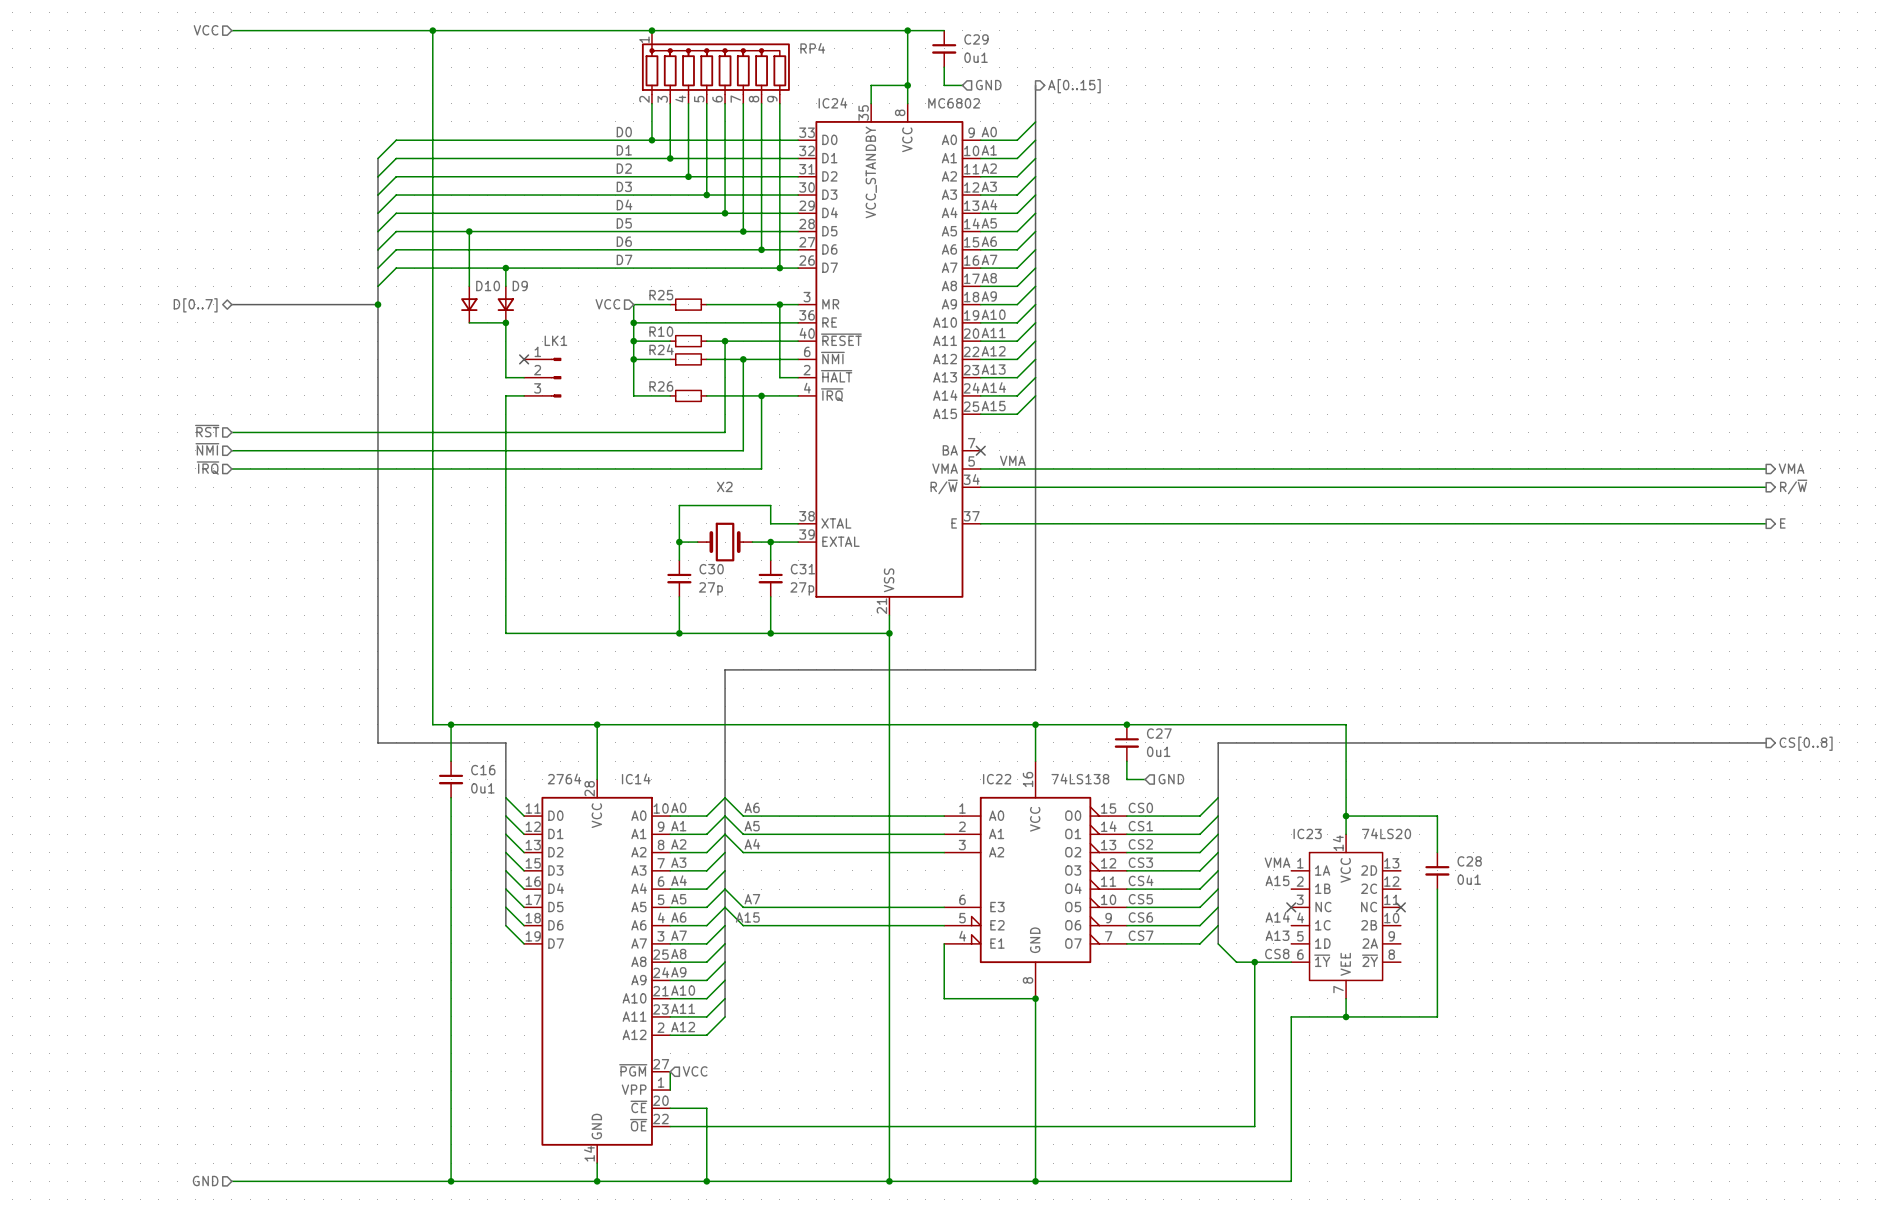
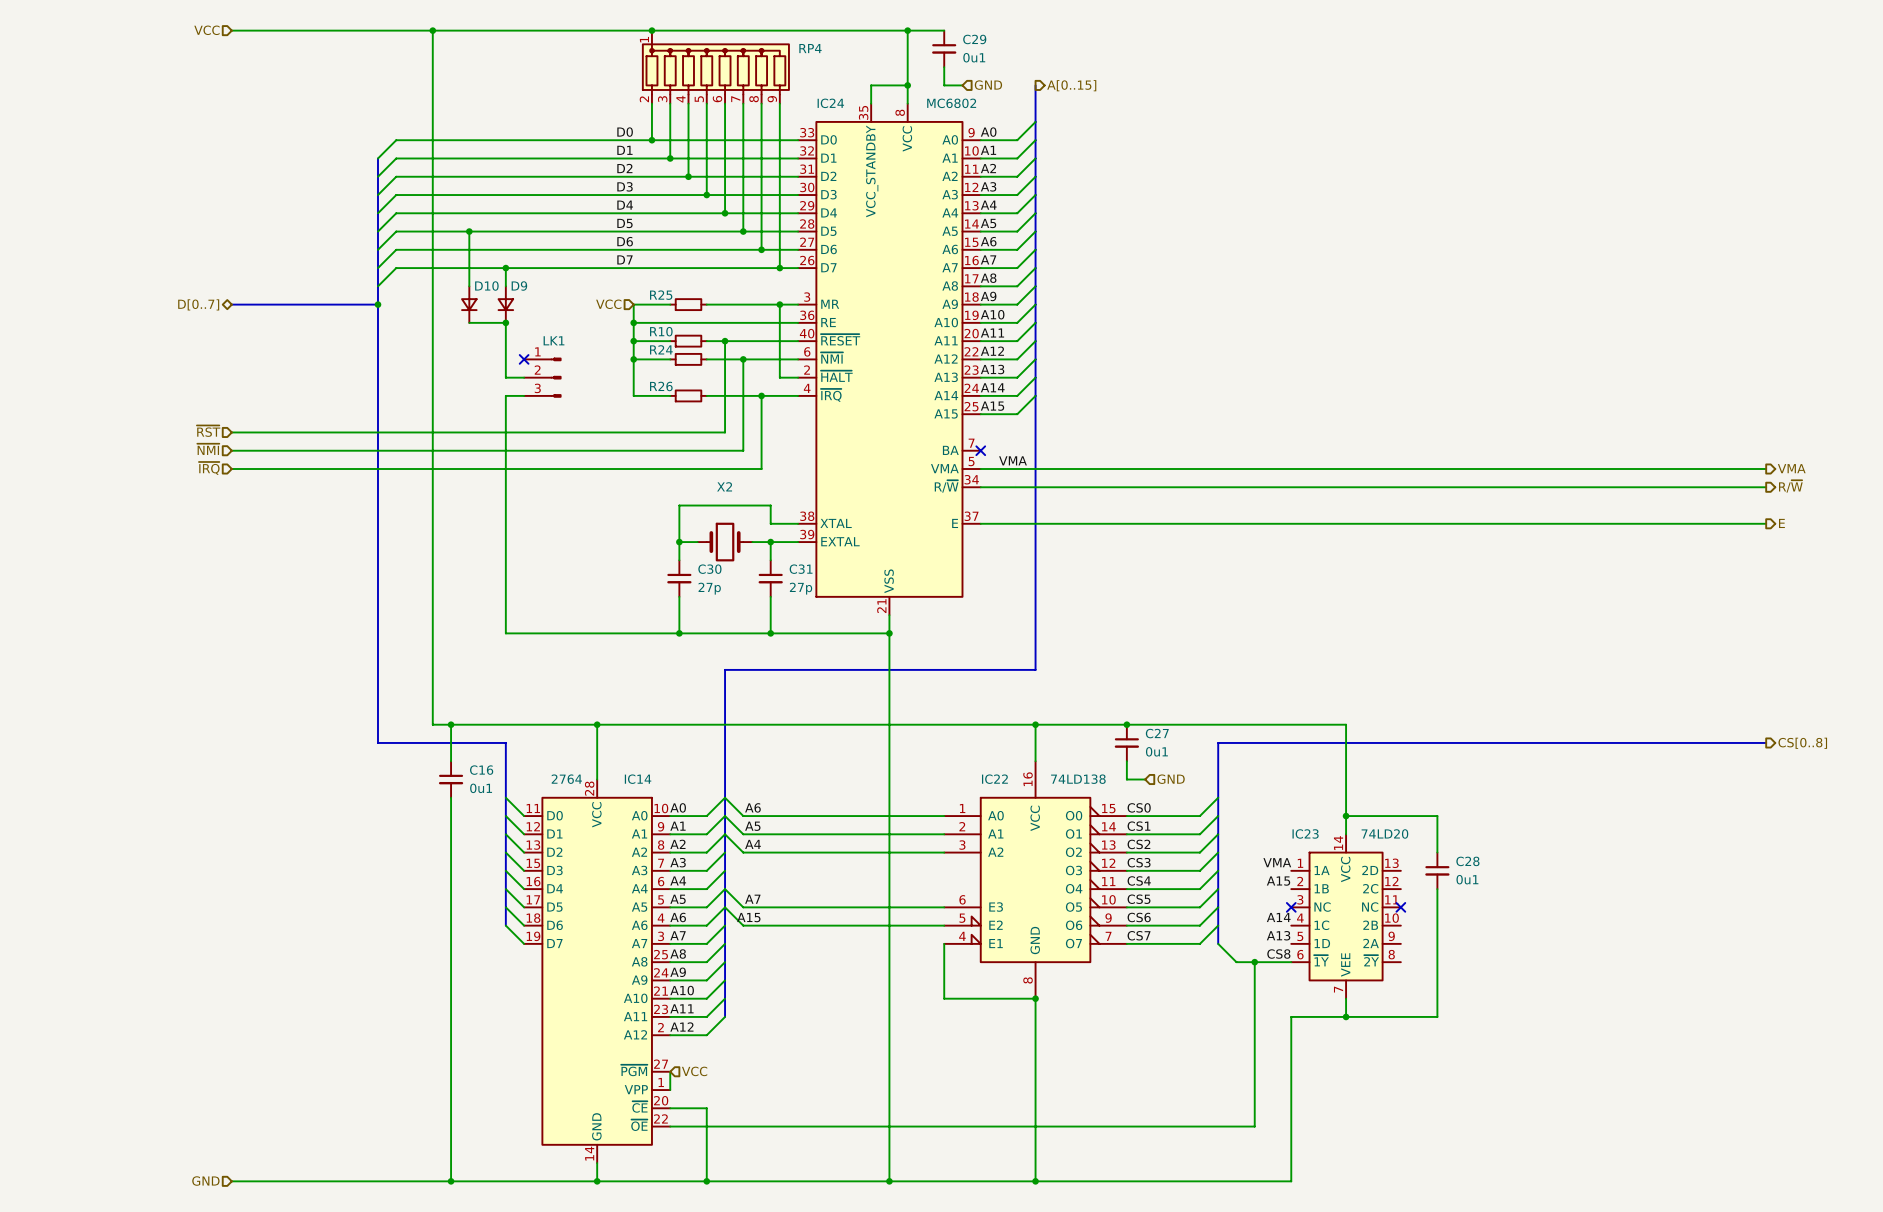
IC22 value: 74LS138 (1080, 778) -> 74LD138 (1078, 779)
IC23 value: 74LS20 (1386, 833) -> 74LD20 (1384, 833)

